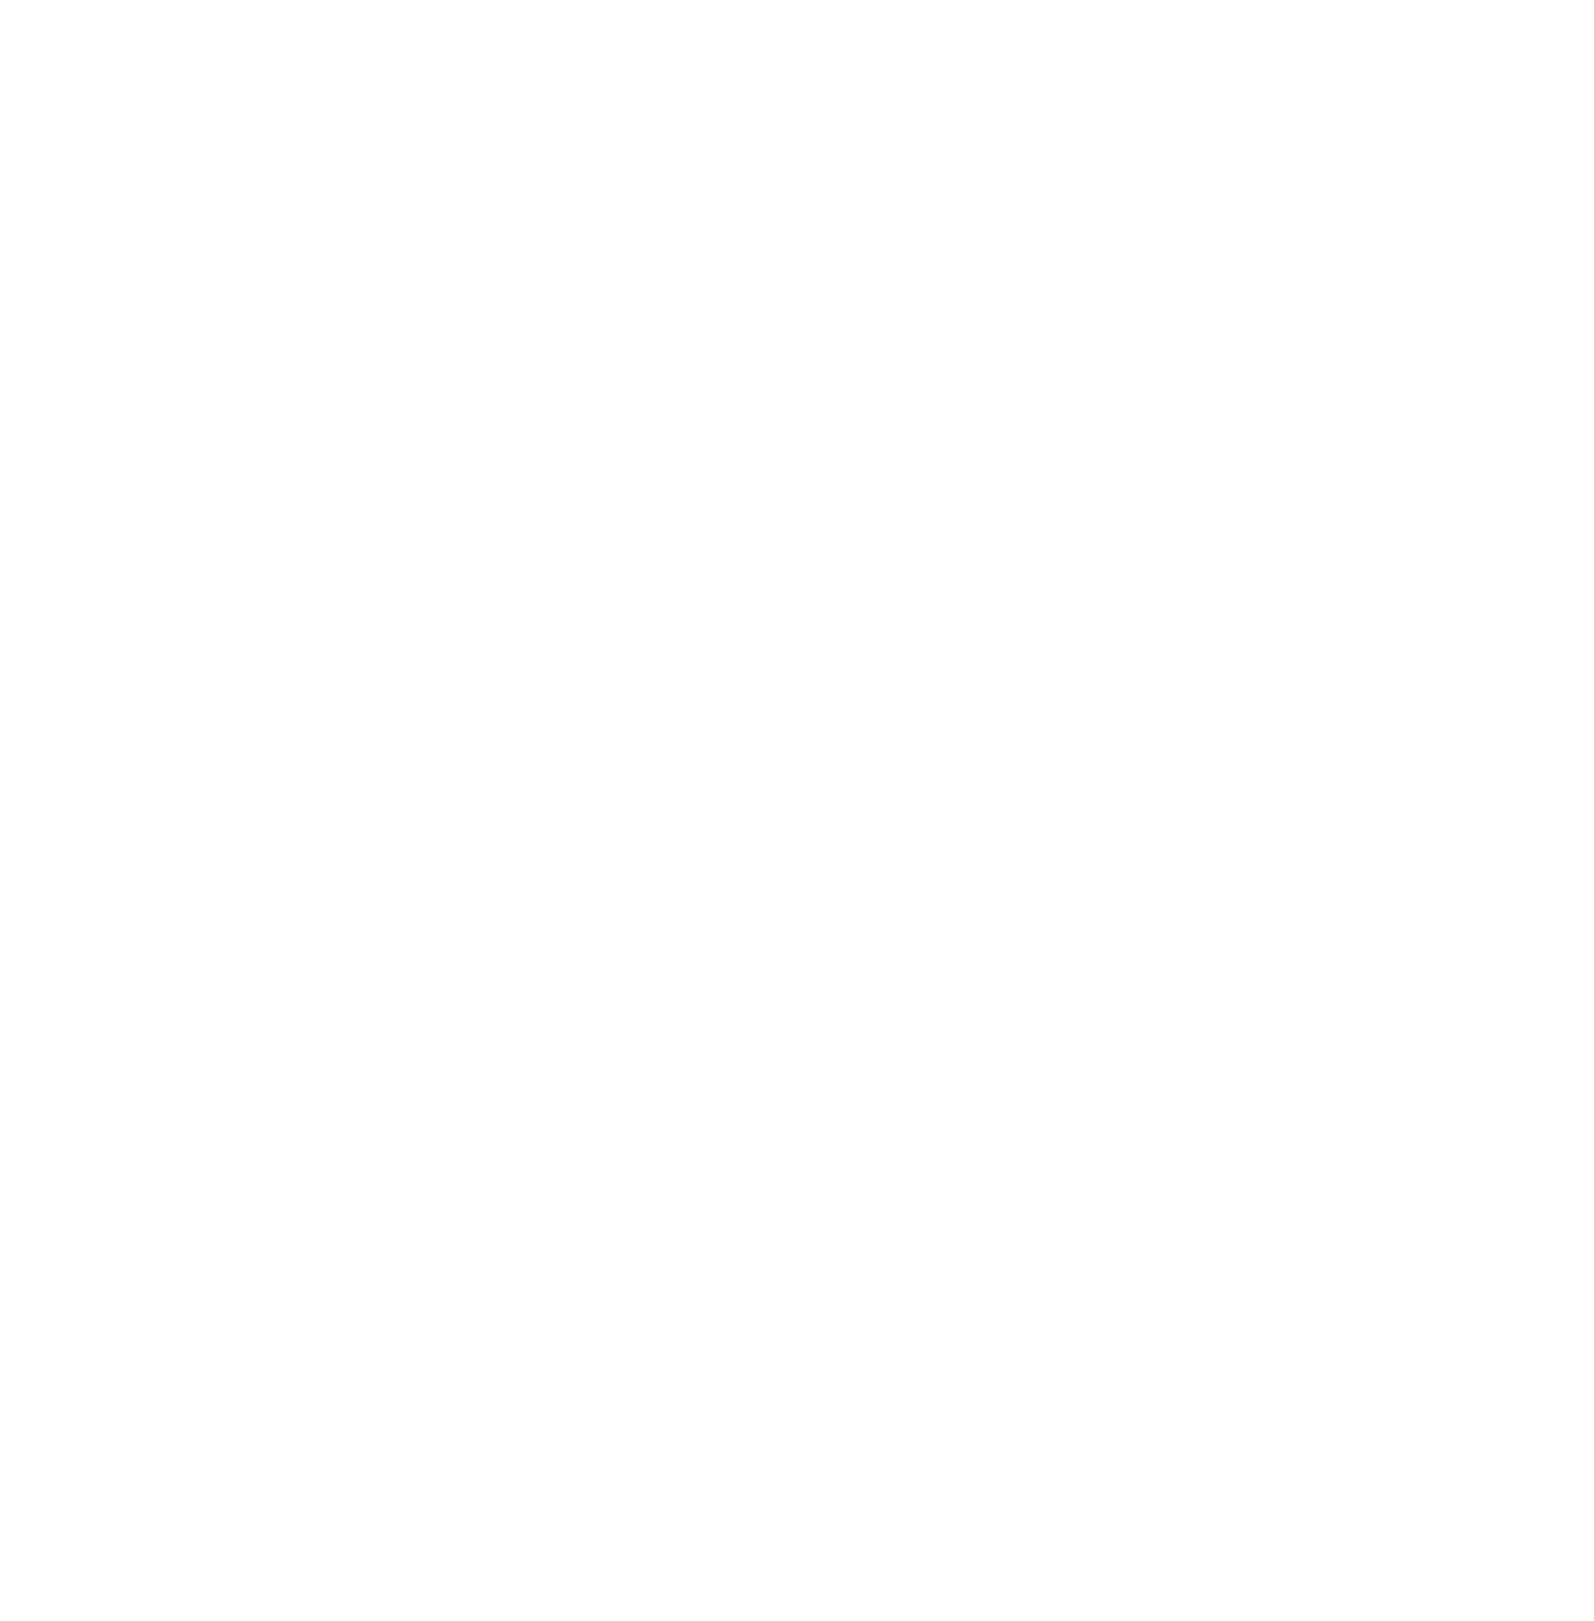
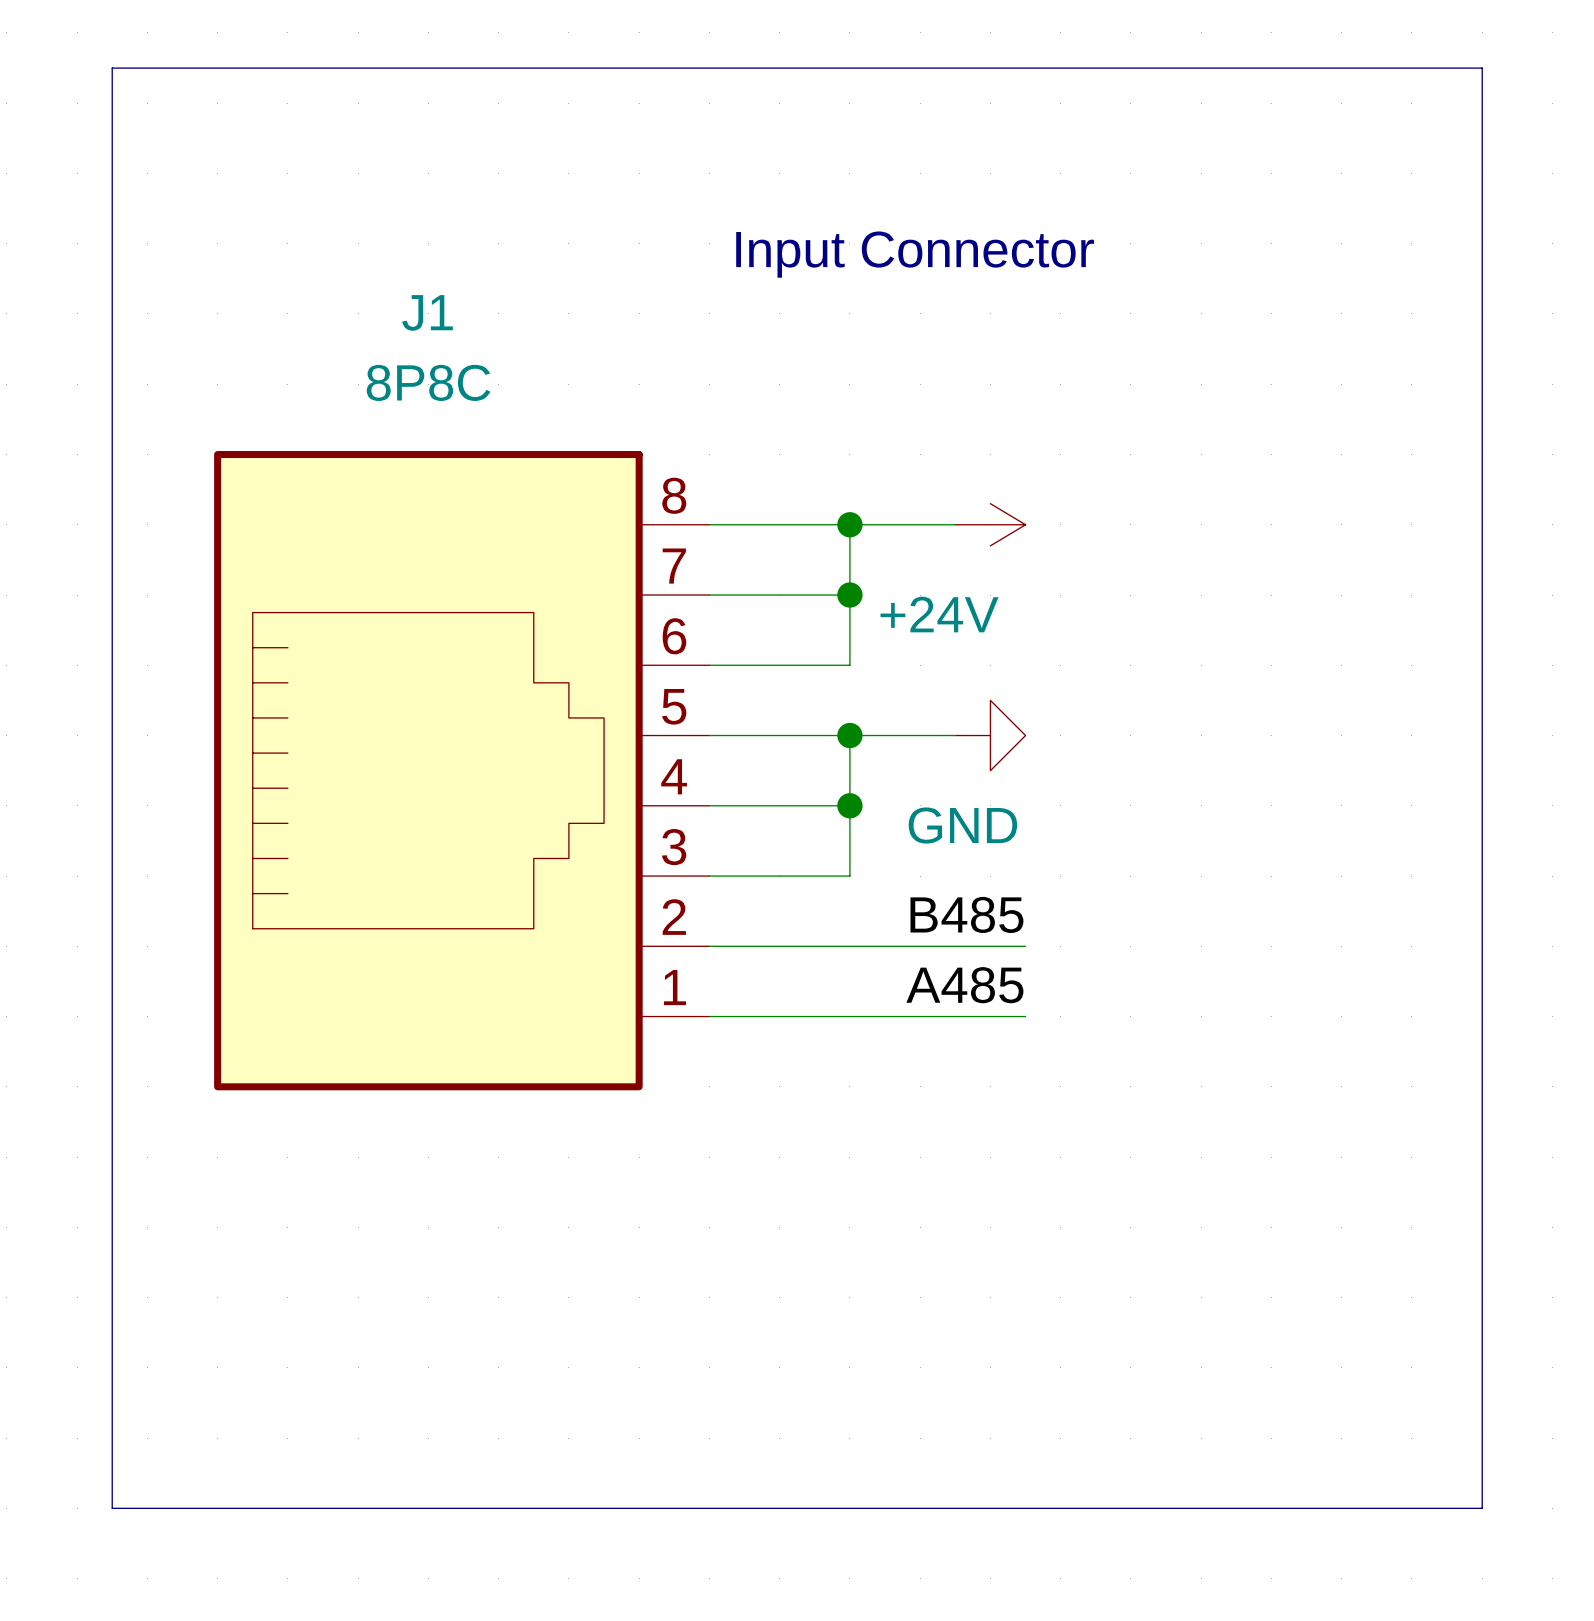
line: none -> (112, 68) (1482, 68) (1482, 1508) (112, 1508) (112, 68)
text: none -> Input Connector (915, 254)
wire: none -> (709, 524) (955, 524)
wire: none -> (849, 524) (849, 665) (709, 665)
junction: none -> (849, 524)
power symbol: none -> +24V (990, 524)
wire: none -> (709, 595) (849, 595)
junction: none -> (849, 595)
wire: none -> (709, 735) (955, 735)
wire: none -> (849, 735) (849, 876) (709, 876)
junction: none -> (849, 735)
power symbol: none -> GND (990, 735)
J1: none -> 8P8C (461, 770)
wire: none -> (709, 805) (849, 805)
junction: none -> (849, 805)
label: none -> B485 (966, 914)
wire: none -> (709, 946) (1025, 946)
label: none -> A485 (964, 985)
wire: none -> (709, 1016) (1025, 1016)

